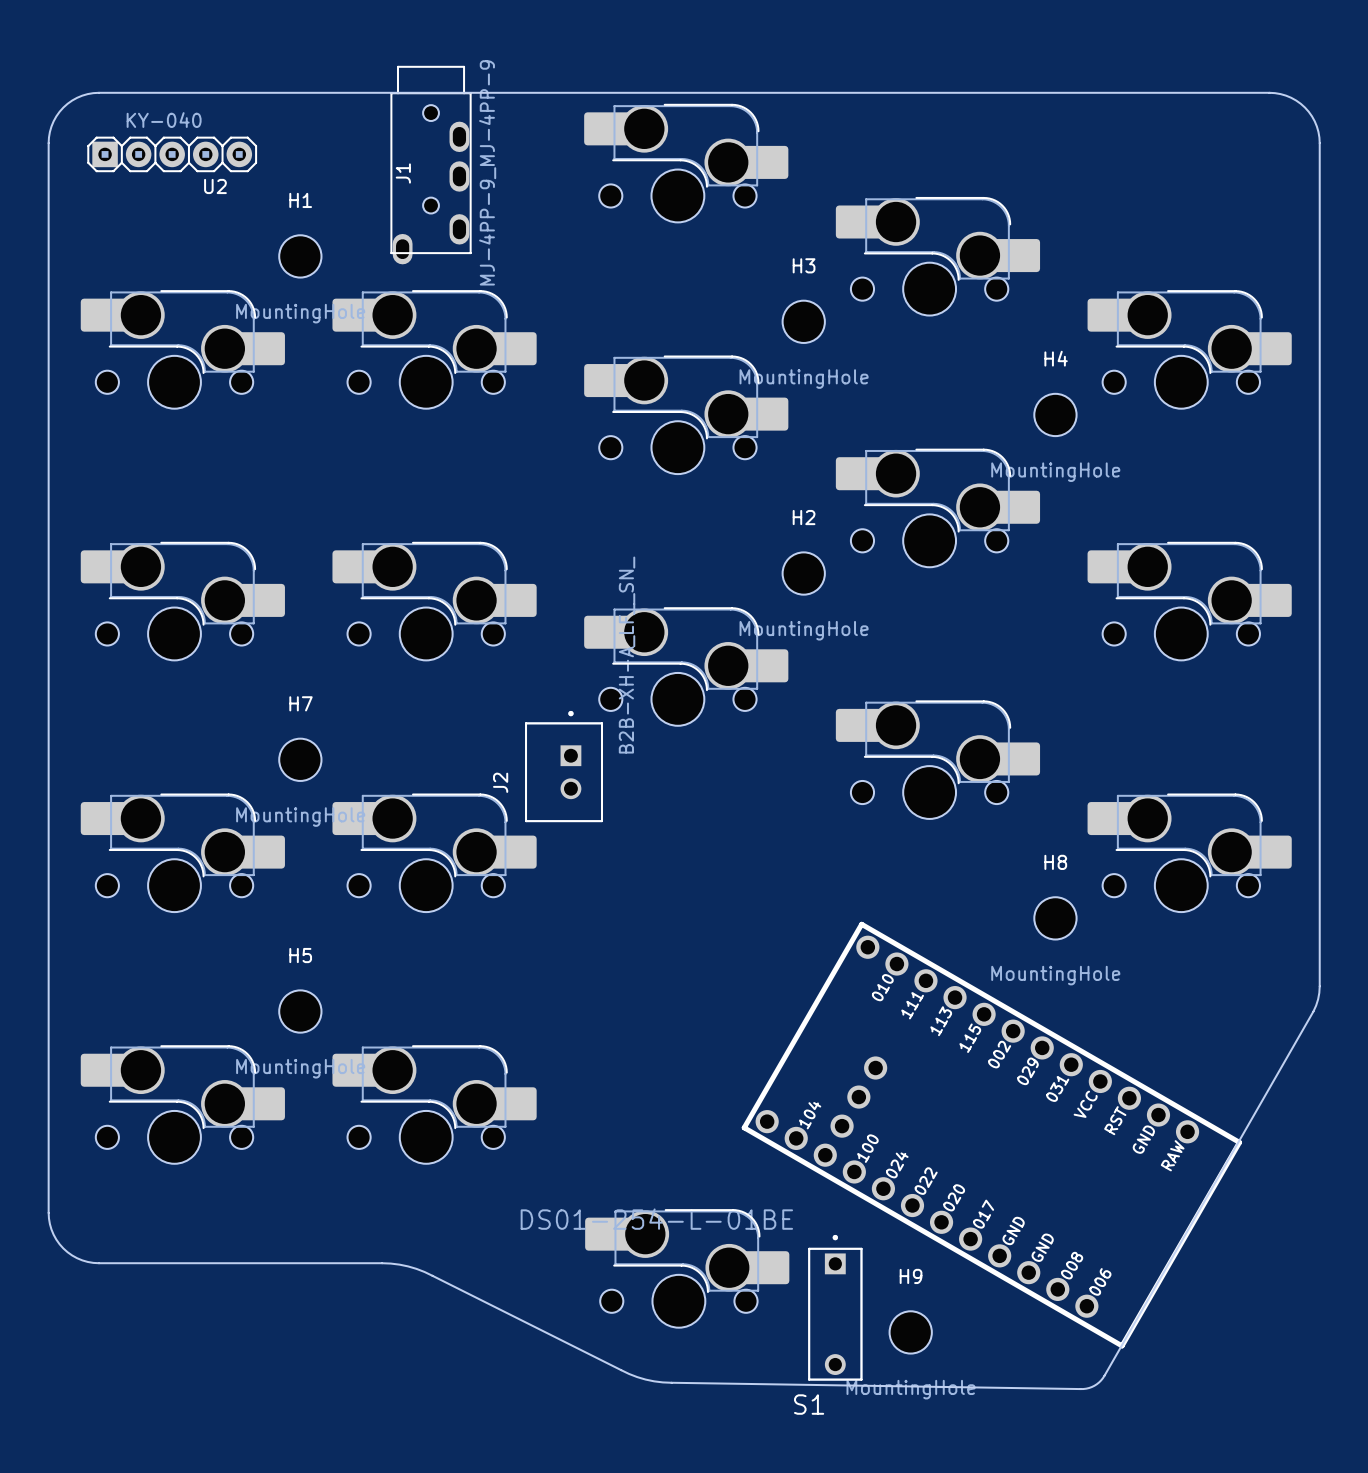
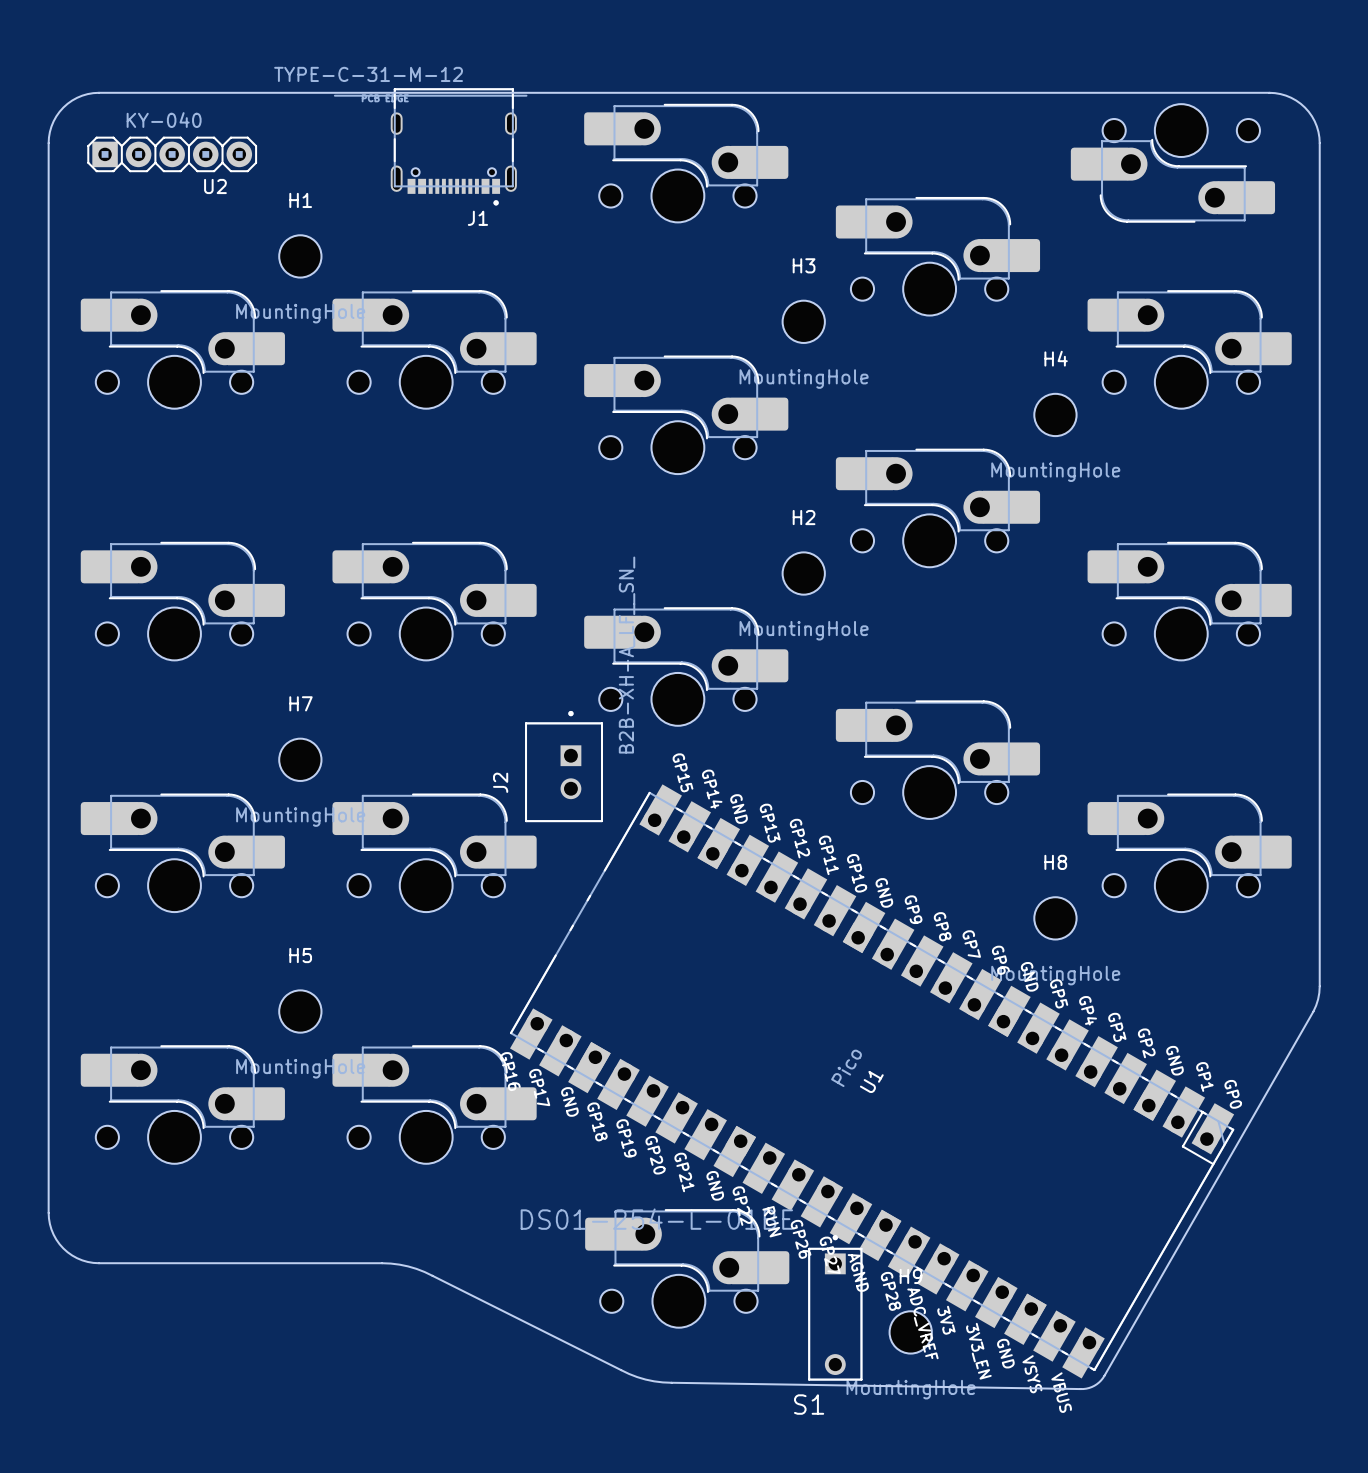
J1 footprint: [390, 65, 472, 265] -> [334, 88, 528, 206]
part footprint: [584, 104, 789, 223] -> [584, 104, 789, 223]
part: none -> (1172, 163)
J1 value: MJ-4PP-9_MJ-4PP-9 (487, 172) -> TYPE-C-31-M-12 (368, 74)
J1 name position: J1 (403, 173) -> J1 (477, 218)
part footprint: [835, 197, 1041, 316] -> [835, 197, 1041, 316]
part footprint: [80, 290, 285, 409] -> [80, 290, 285, 409]
part footprint: [332, 290, 537, 409] -> [332, 290, 537, 409]
part footprint: [1087, 290, 1292, 409] -> [1087, 290, 1292, 409]
part footprint: [584, 355, 789, 475] -> [584, 355, 789, 475]
part footprint: [835, 448, 1041, 568] -> [835, 448, 1041, 568]
part footprint: [80, 542, 285, 661] -> [80, 542, 285, 661]
part footprint: [332, 542, 537, 661] -> [332, 542, 537, 661]
part footprint: [1087, 542, 1292, 661] -> [1087, 542, 1292, 661]
part footprint: [584, 607, 789, 726] -> [584, 607, 789, 726]
part footprint: [835, 700, 1041, 819] -> [835, 700, 1041, 819]
part footprint: [80, 793, 285, 913] -> [80, 793, 285, 913]
part footprint: [332, 793, 537, 913] -> [332, 793, 537, 913]
part footprint: [1087, 793, 1292, 913] -> [1087, 793, 1292, 913]
part footprint: [80, 1045, 285, 1164] -> [80, 1045, 285, 1164]
part footprint: [332, 1045, 537, 1164] -> [332, 1045, 537, 1164]
U1: none -> Pico (872, 1081)
part: (991, 1135) -> none
part footprint: [585, 1209, 790, 1328] -> [585, 1209, 790, 1328]

